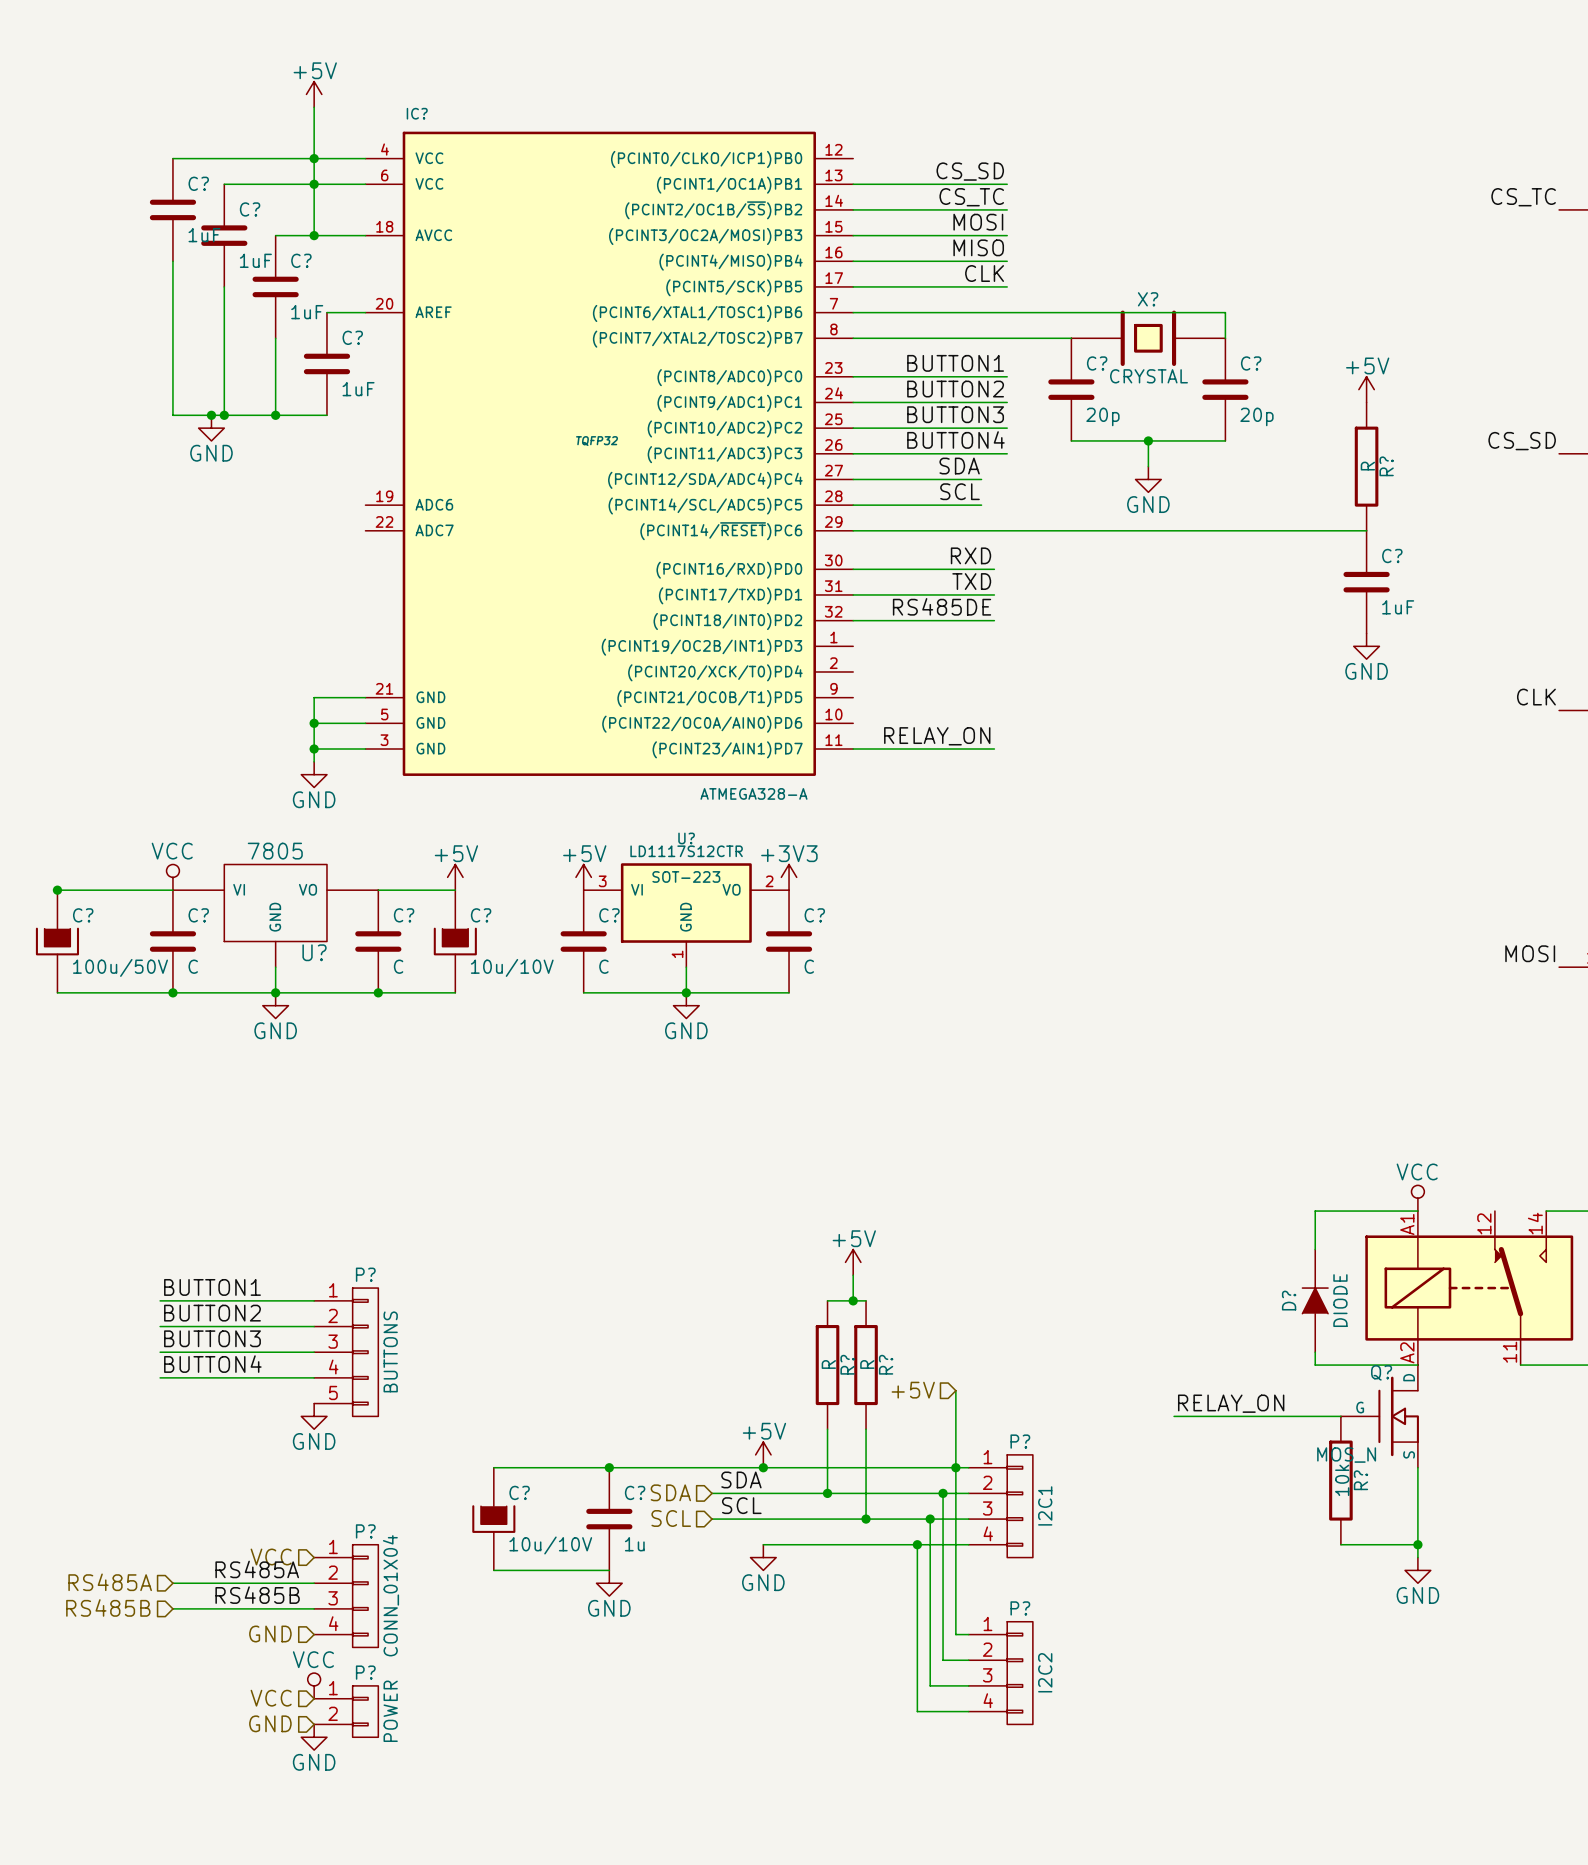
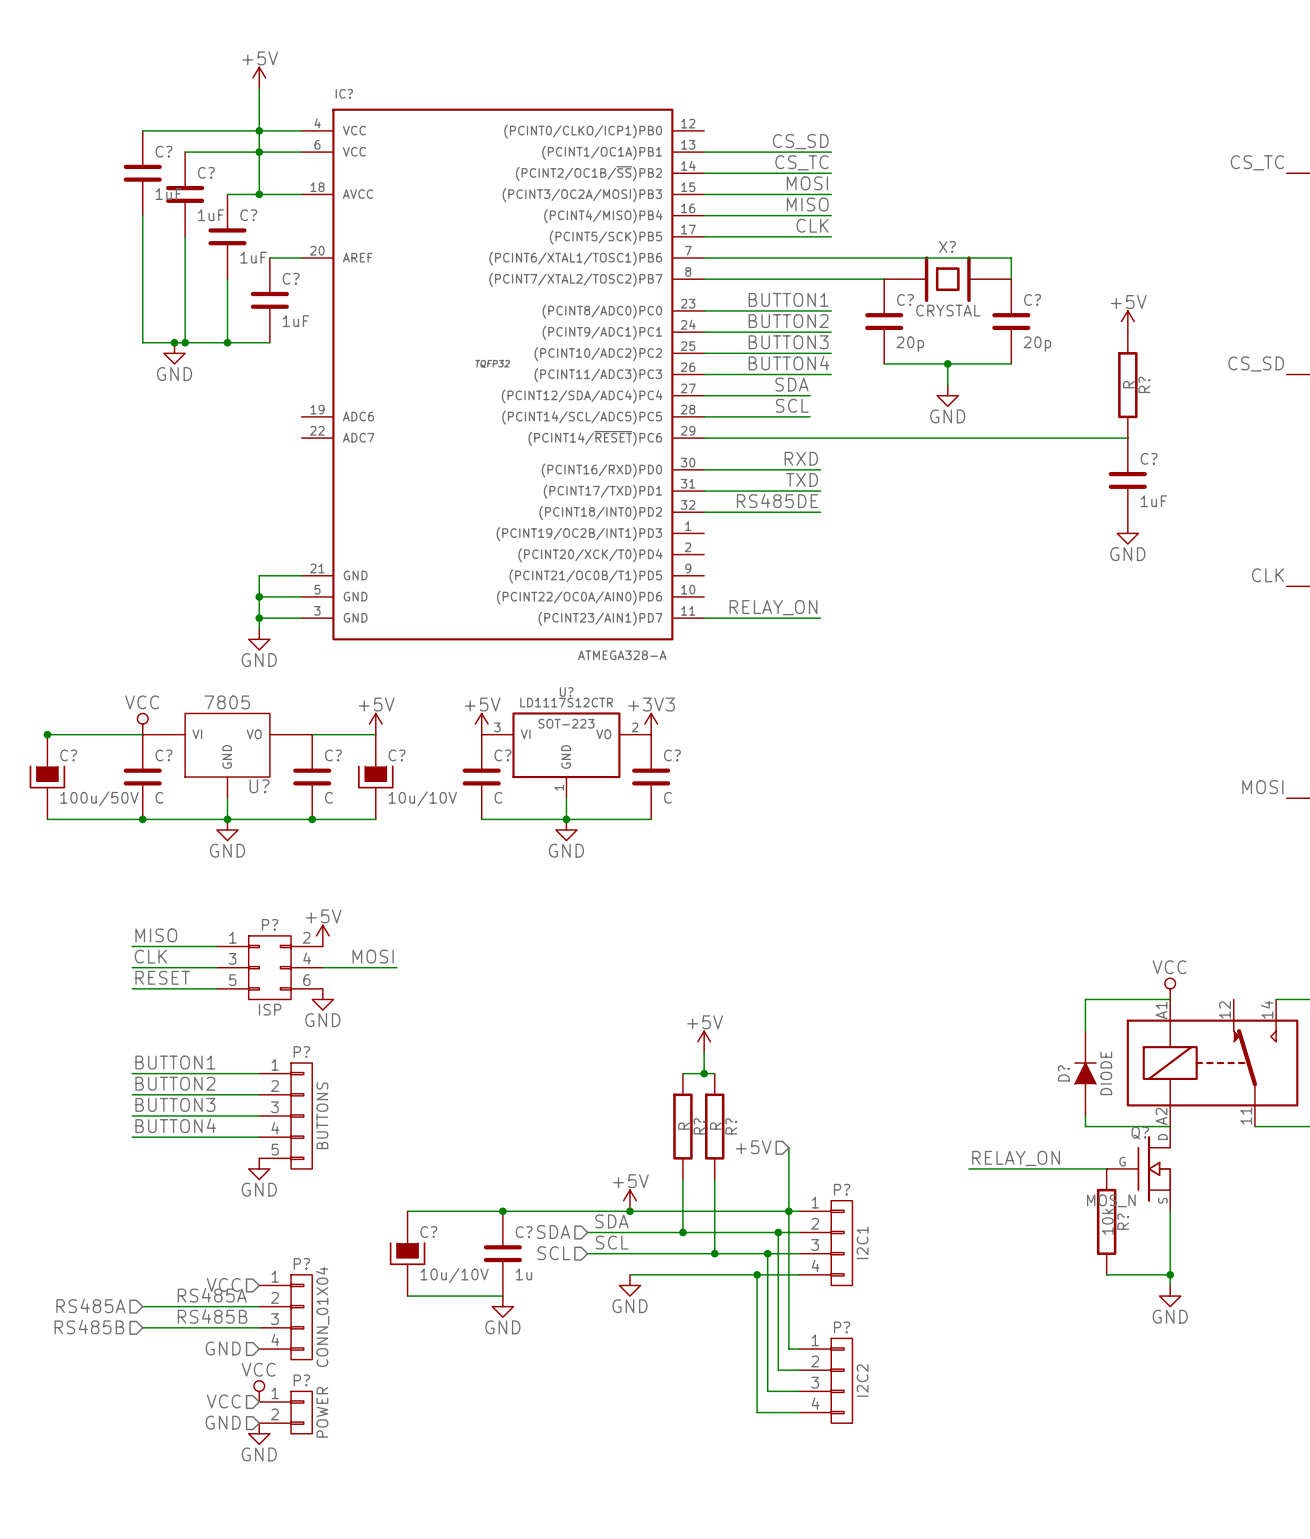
label: none -> MISO (156, 935)
power symbol: none -> +5V (322, 935)
wire: none -> (132, 946) (216, 946)
label: none -> CLK (150, 956)
label: none -> MOSI (373, 956)
wire: none -> (132, 967) (216, 967)
P?: none -> ISP (269, 967)
wire: none -> (322, 967) (396, 967)
label: none -> RESET (162, 977)
wire: none -> (132, 988) (216, 988)
power symbol: none -> GND (322, 999)

